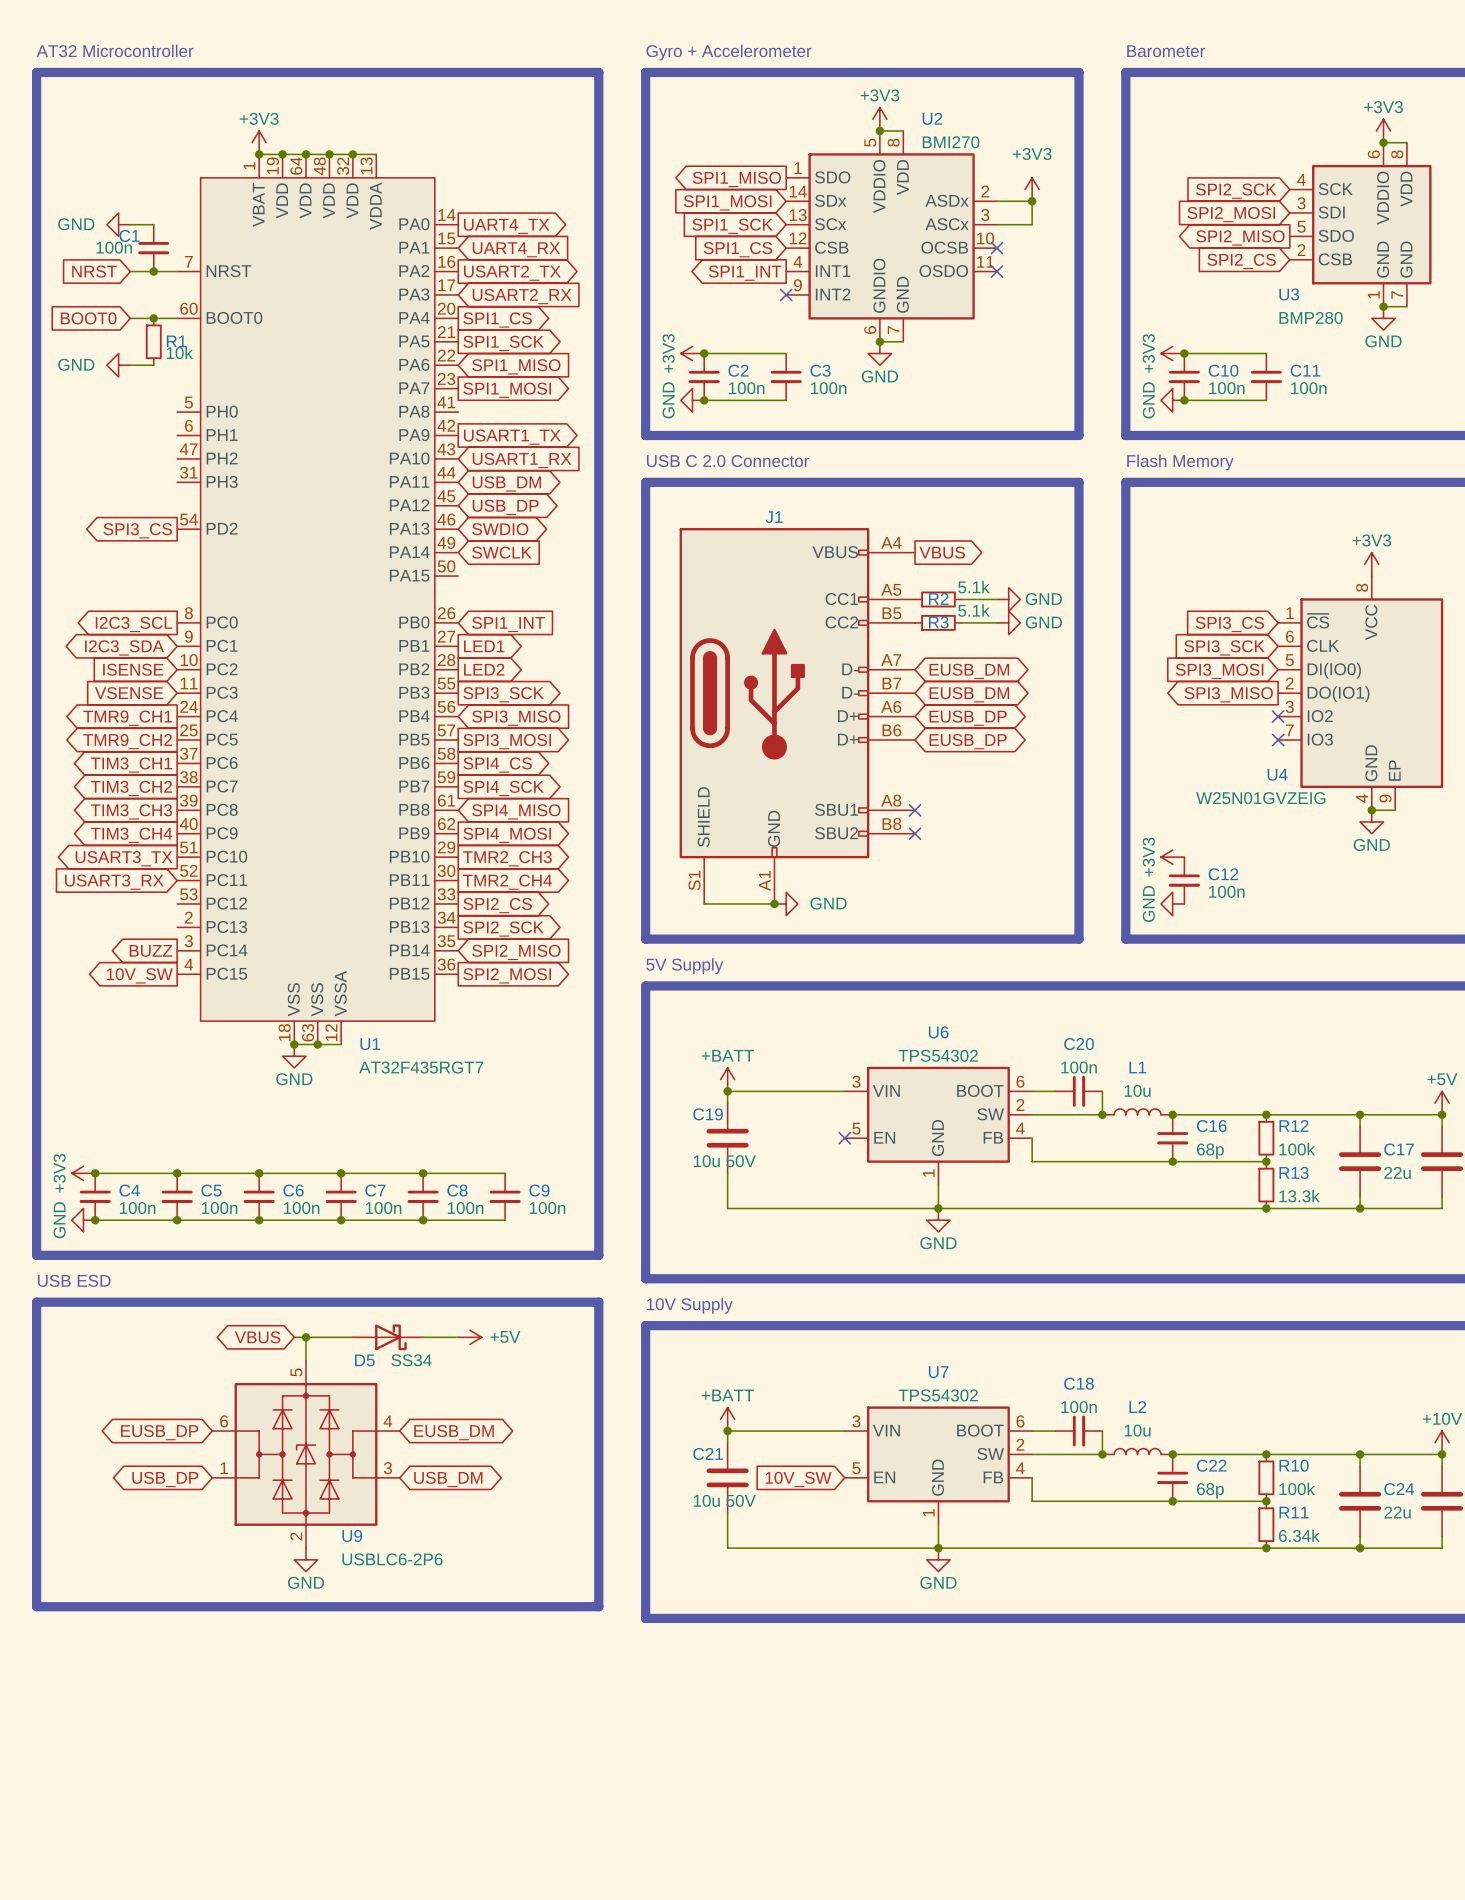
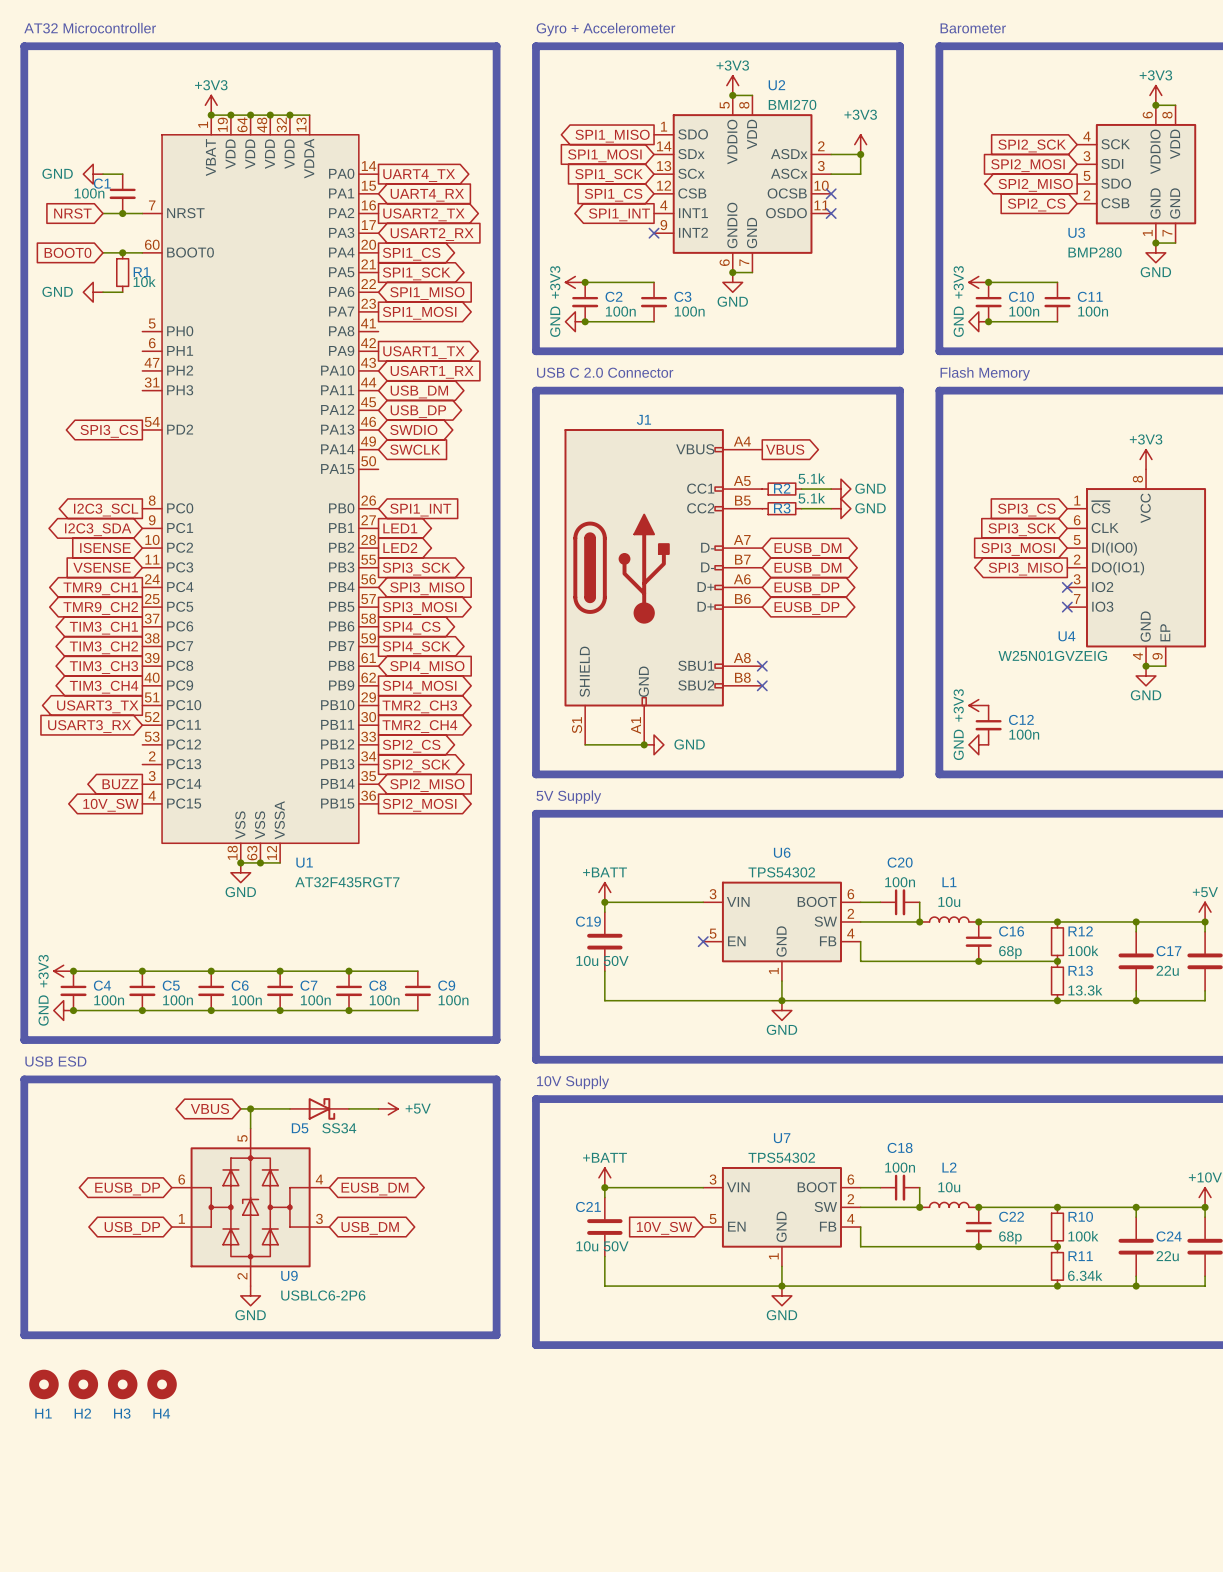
H1: none -> (43, 1384)
H2: none -> (83, 1384)
H3: none -> (122, 1384)
H4: none -> (162, 1384)

